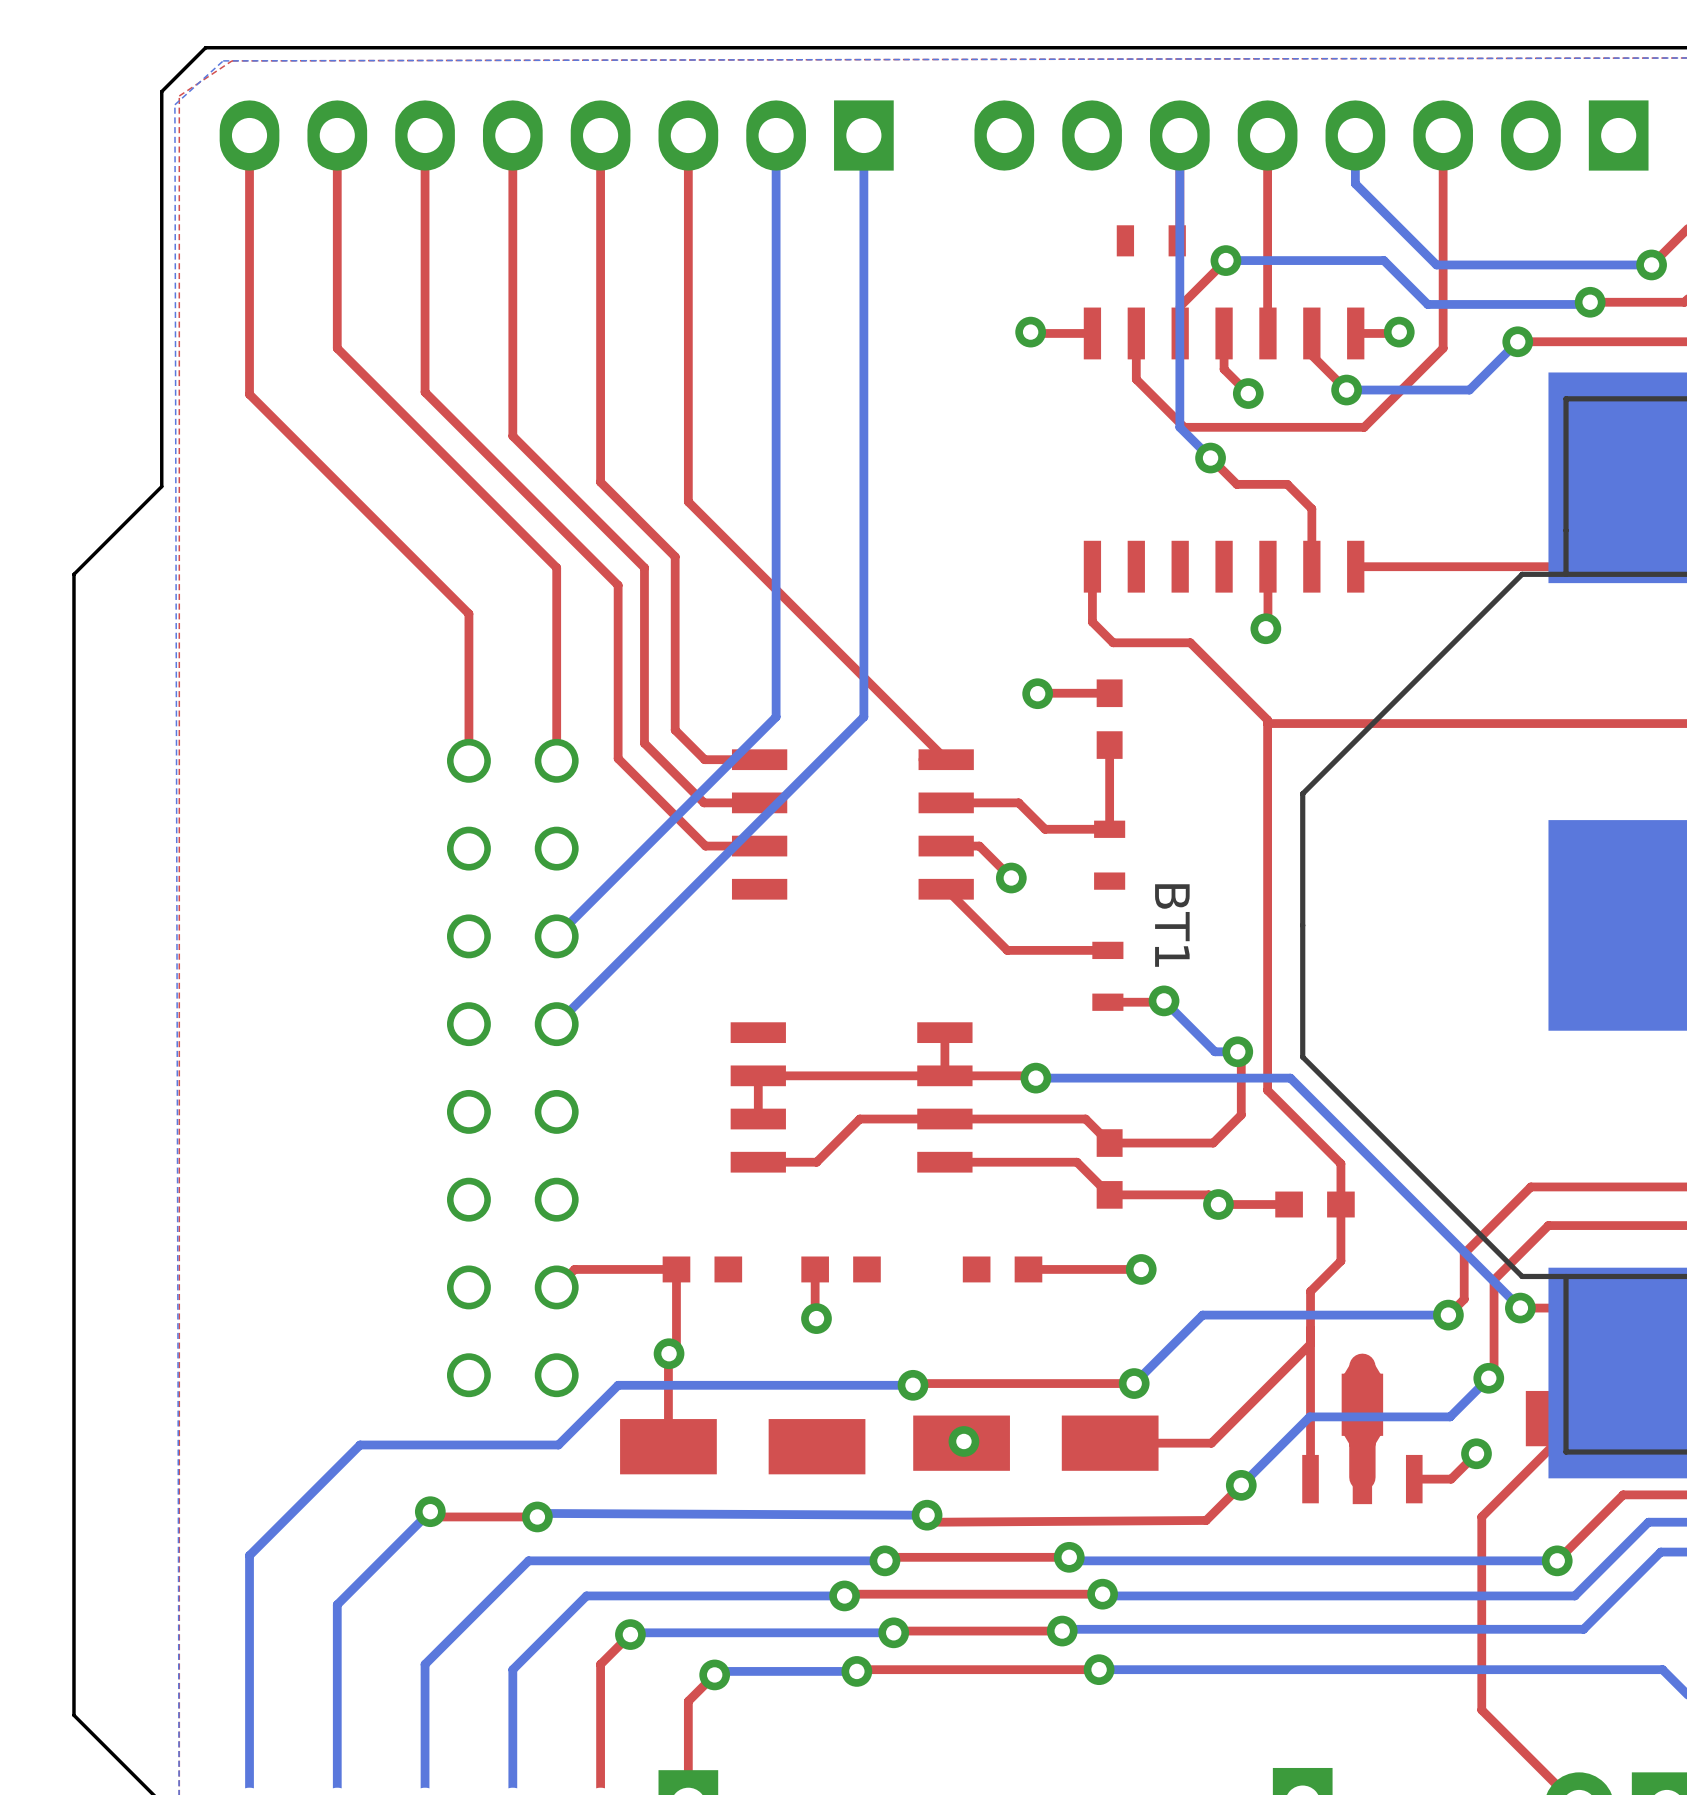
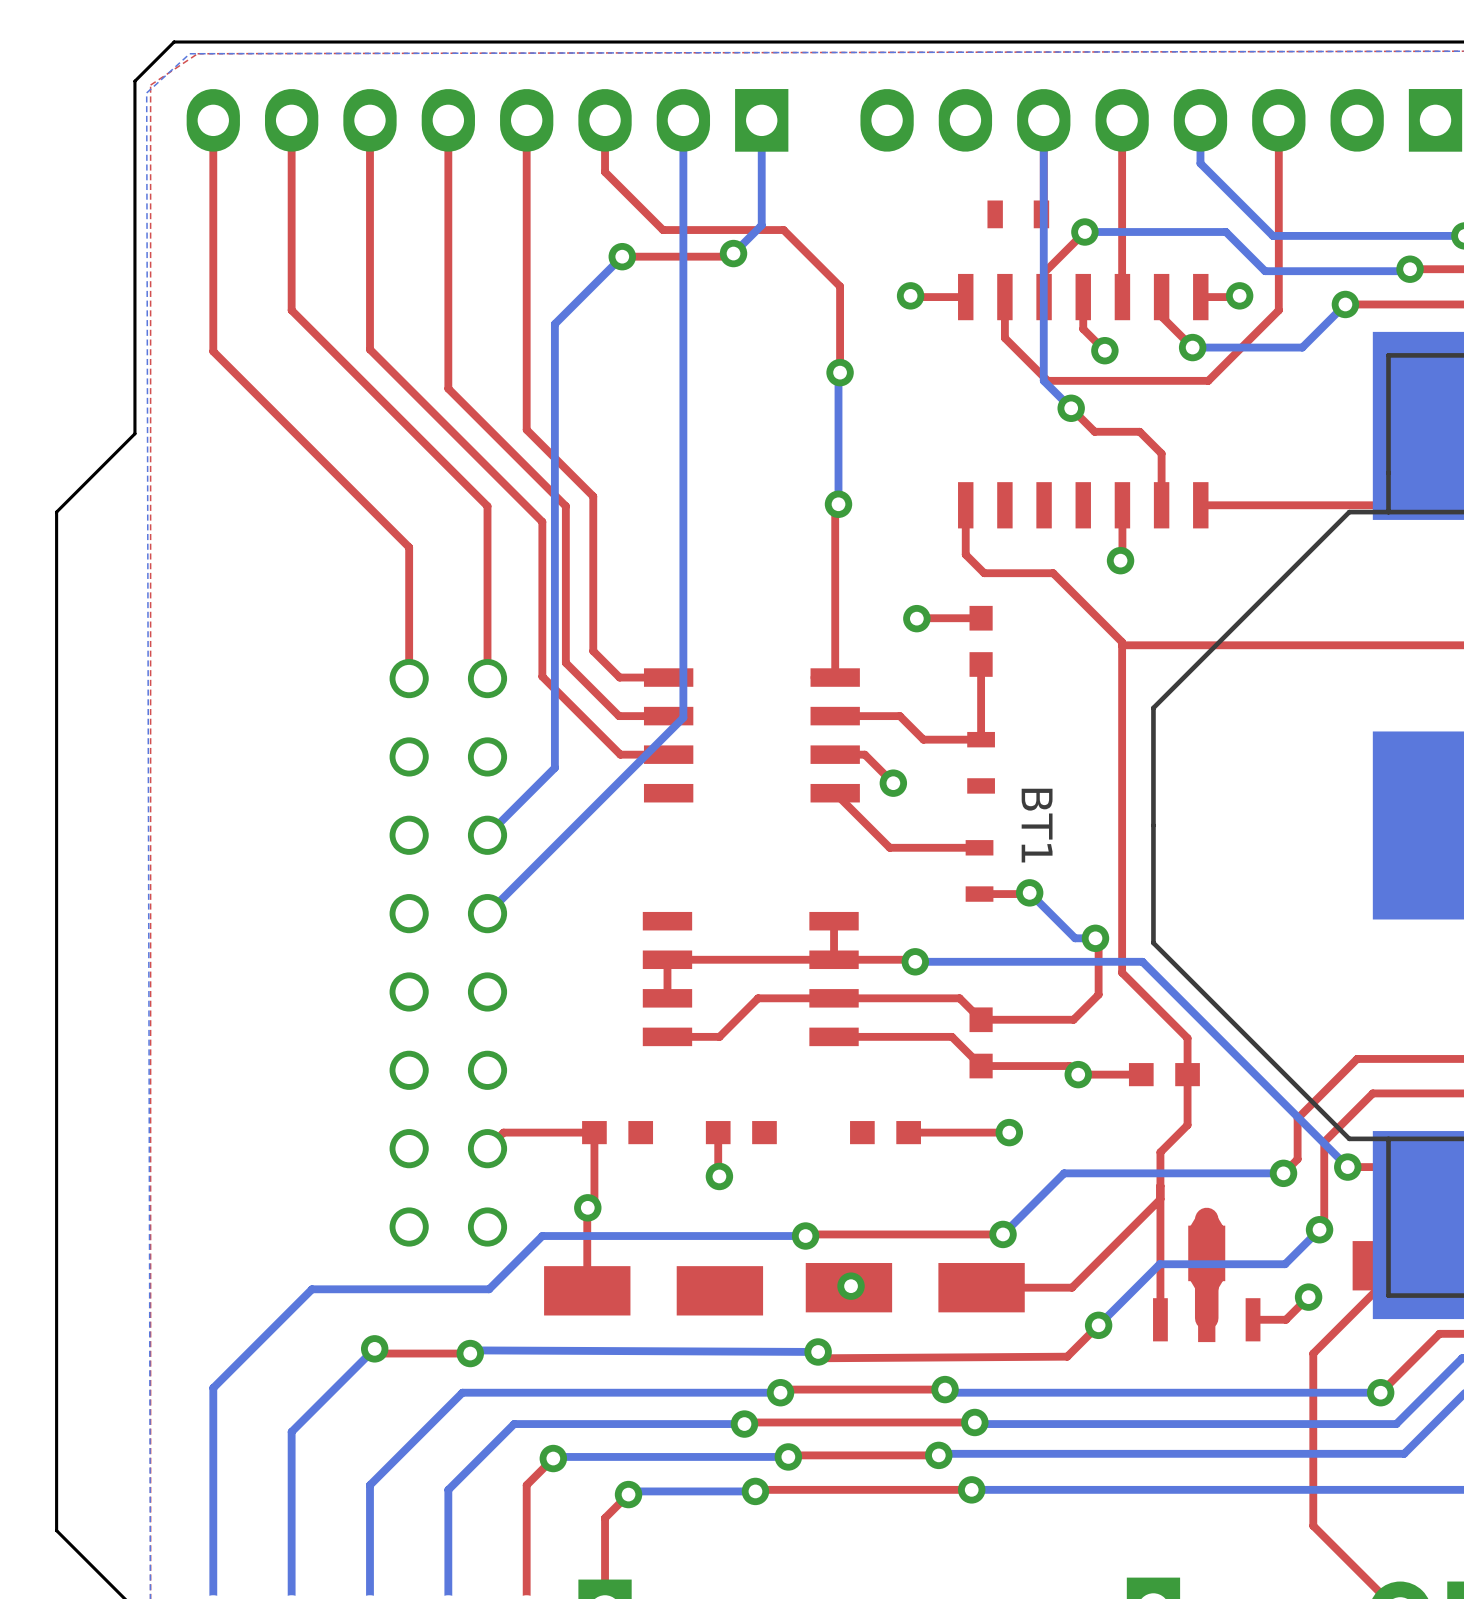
top track: (688, 193) (688, 501) (946, 759) -> (605, 172) (663, 230) (783, 230) (840, 286) (840, 372)
bottom track: (863, 253) (863, 716) (776, 804) -> (761, 225) (733, 253)
top track: none -> (733, 253) (730, 256) (622, 256)
via: none -> (733, 253)
bottom track: none -> (622, 256) (554, 324) (554, 767)
via: none -> (622, 256)
bottom track: none -> (840, 372) (838, 374) (838, 504)
via: none -> (840, 372)
top track: none -> (838, 504) (835, 507) (835, 677)
via: none -> (838, 504)
bottom track: (776, 716) (632, 860) -> (683, 639) (683, 717)

